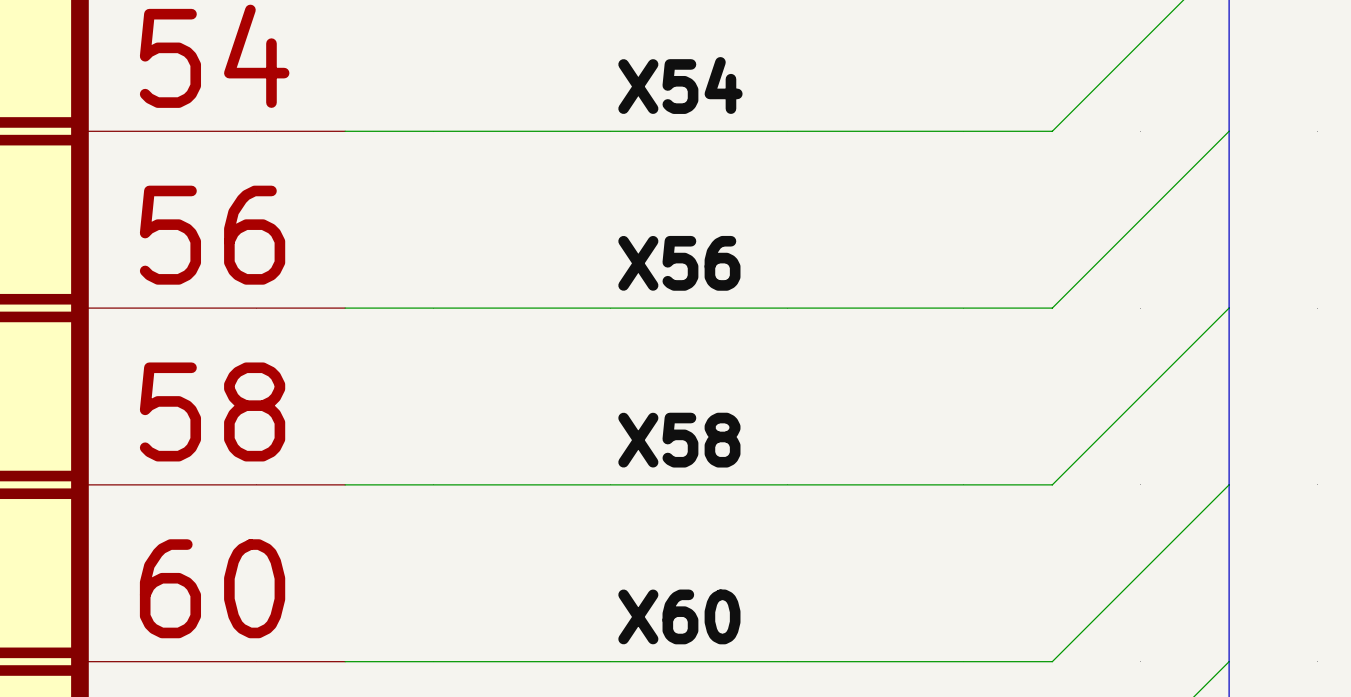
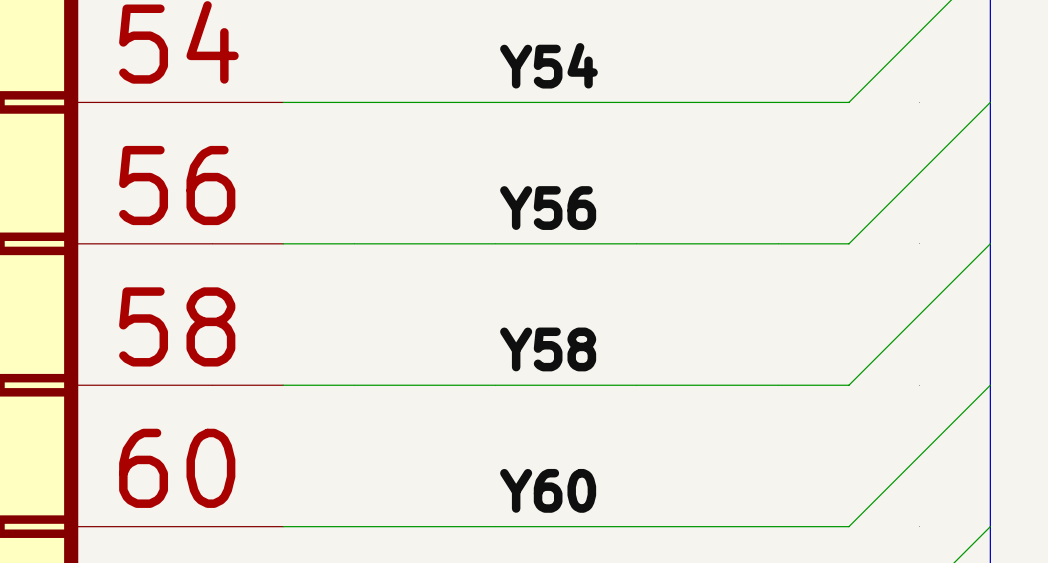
label: X54 (680, 85) -> Y54 (548, 65)
label: X56 (679, 263) -> Y56 (548, 208)
label: X58 (679, 440) -> Y58 (548, 349)
label: X60 (679, 616) -> Y60 (548, 490)

